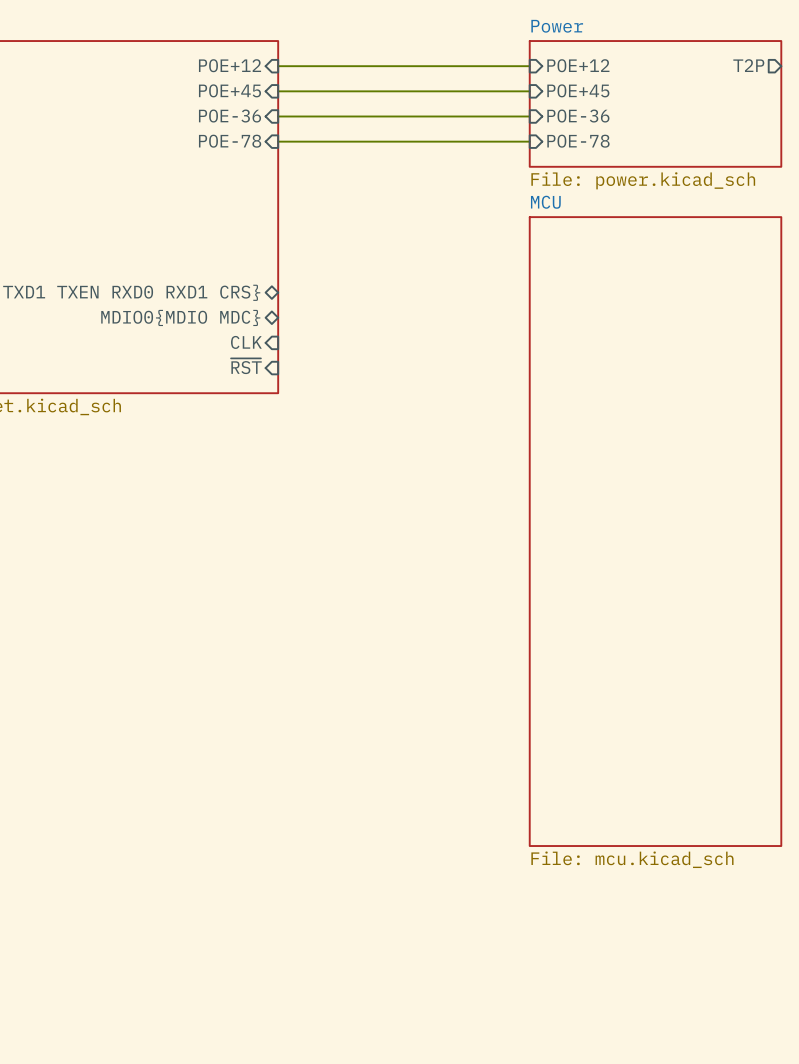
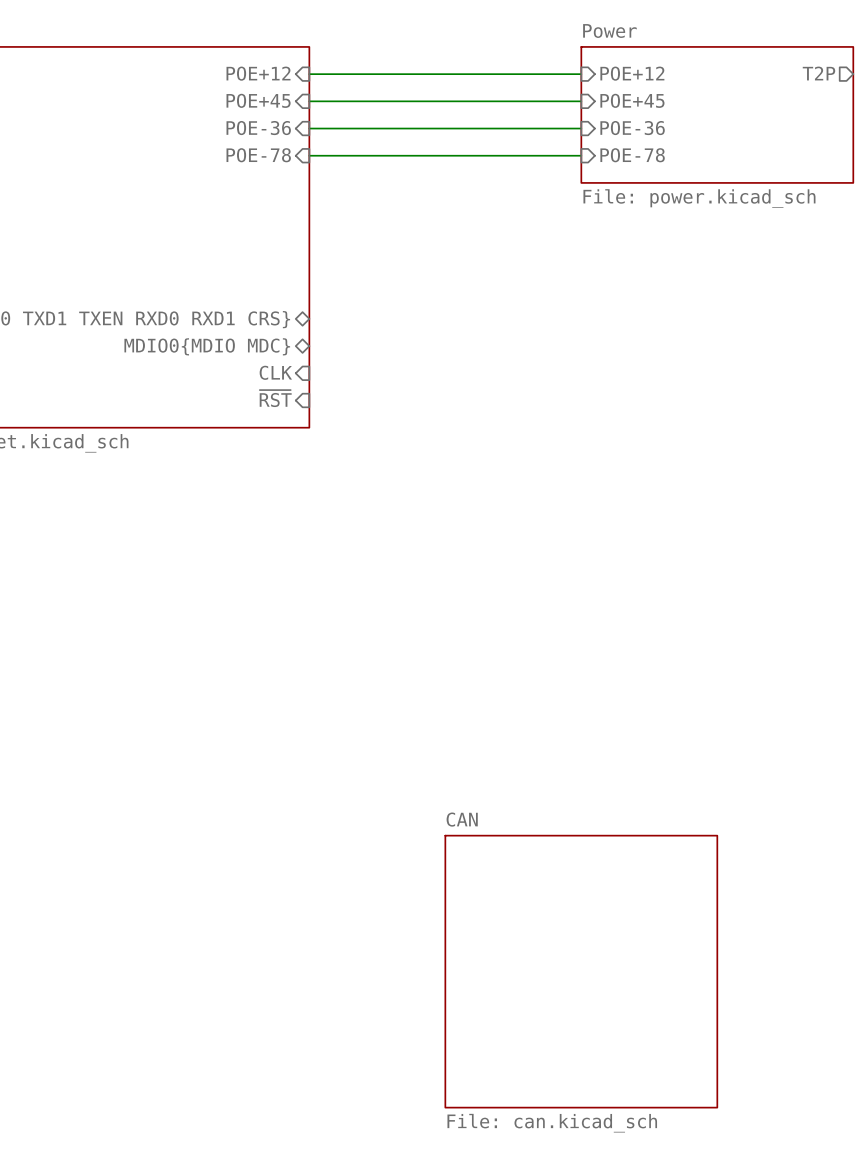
sheet MCU: File: mcu.kicad_sch (655, 531) -> none
sheet CAN: none -> File: can.kicad_sch (581, 971)

